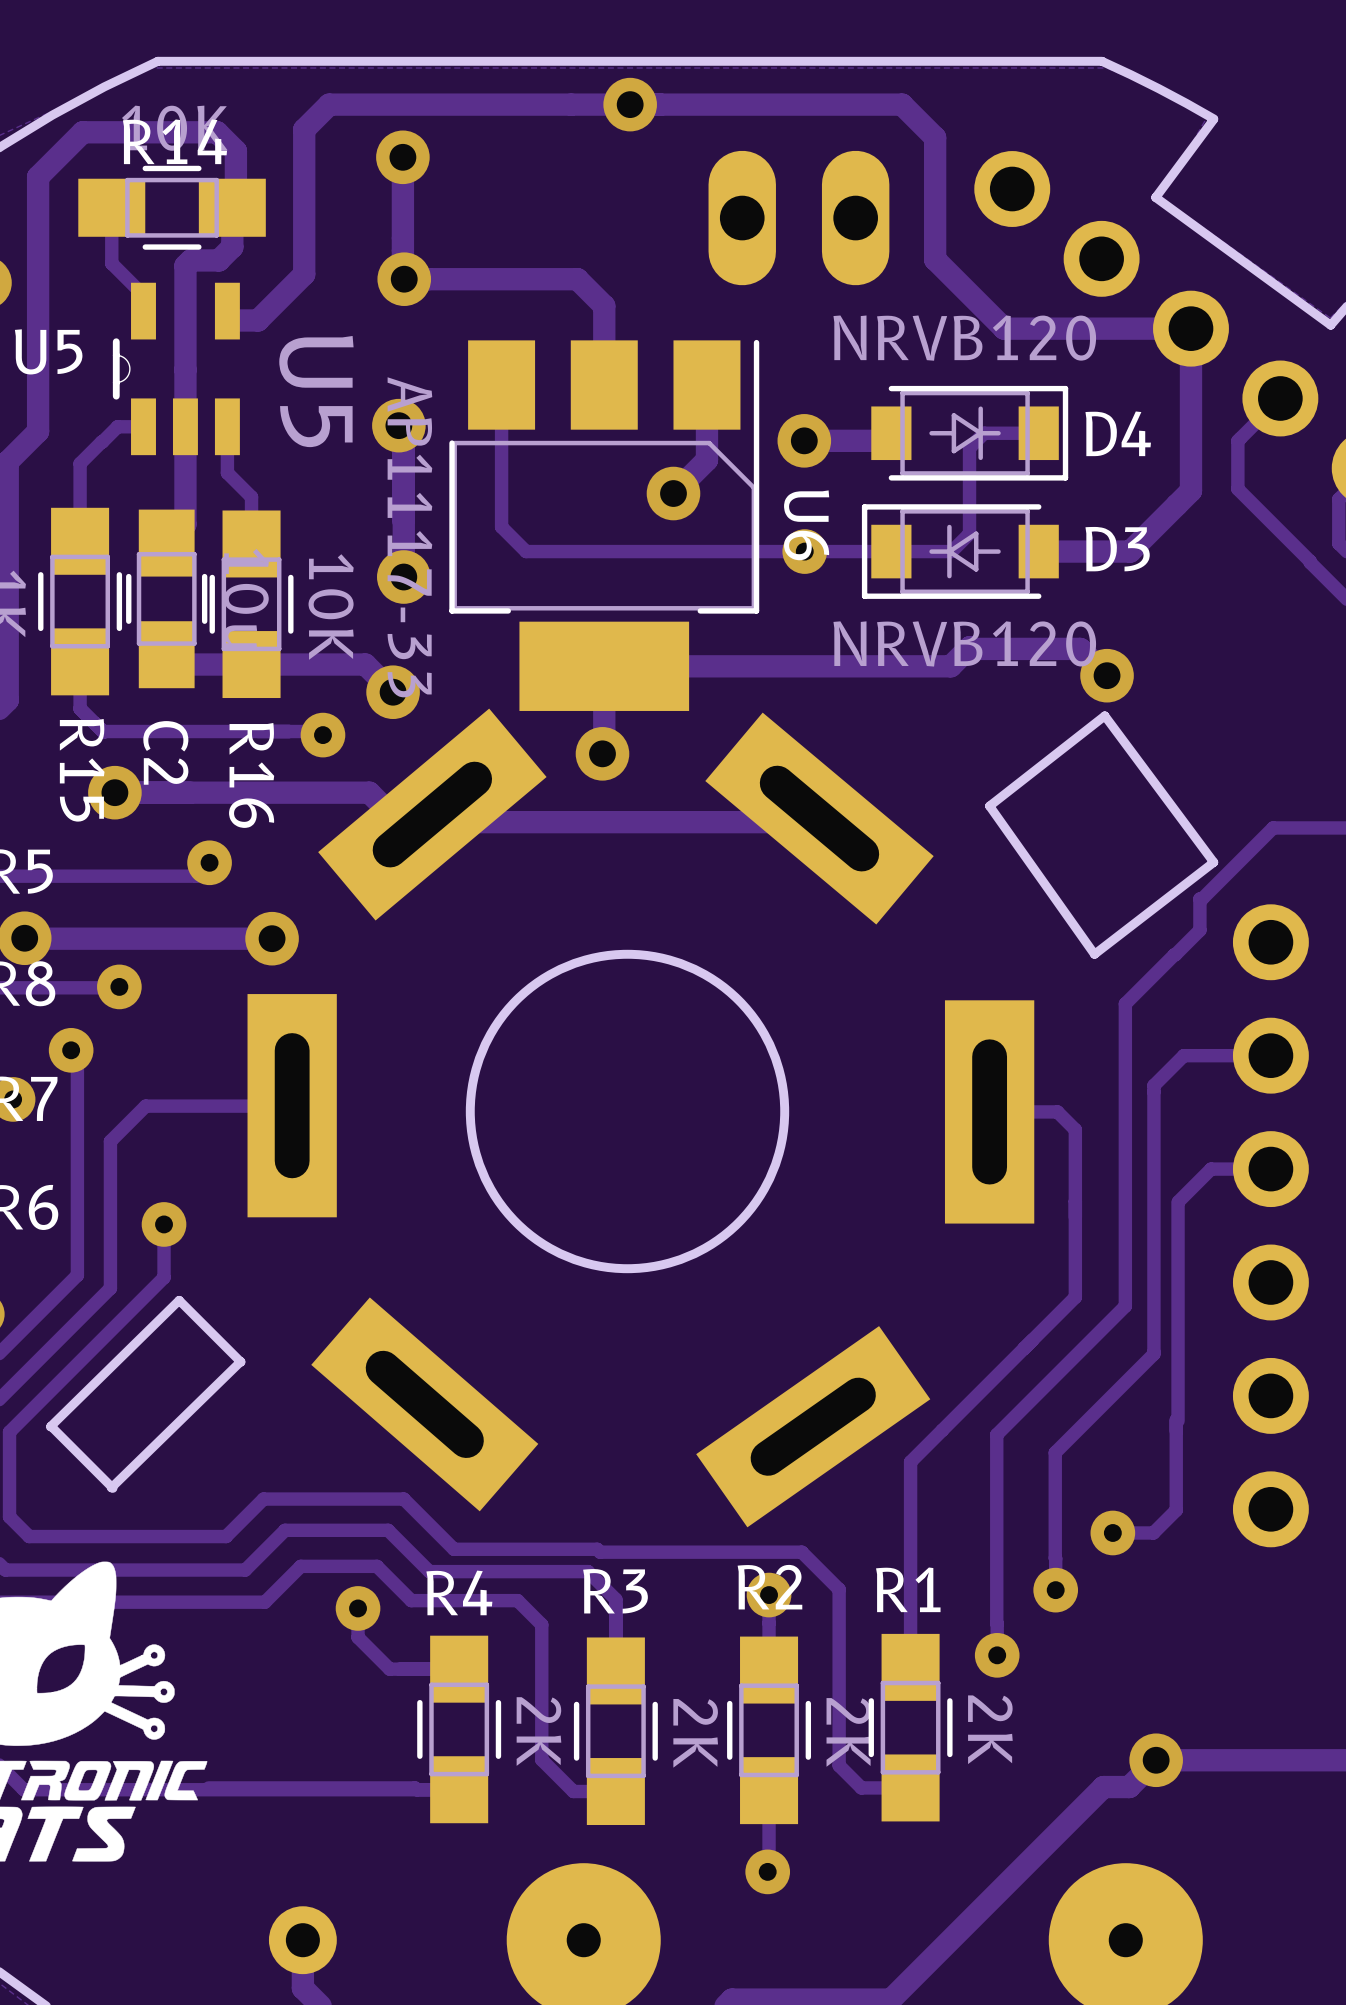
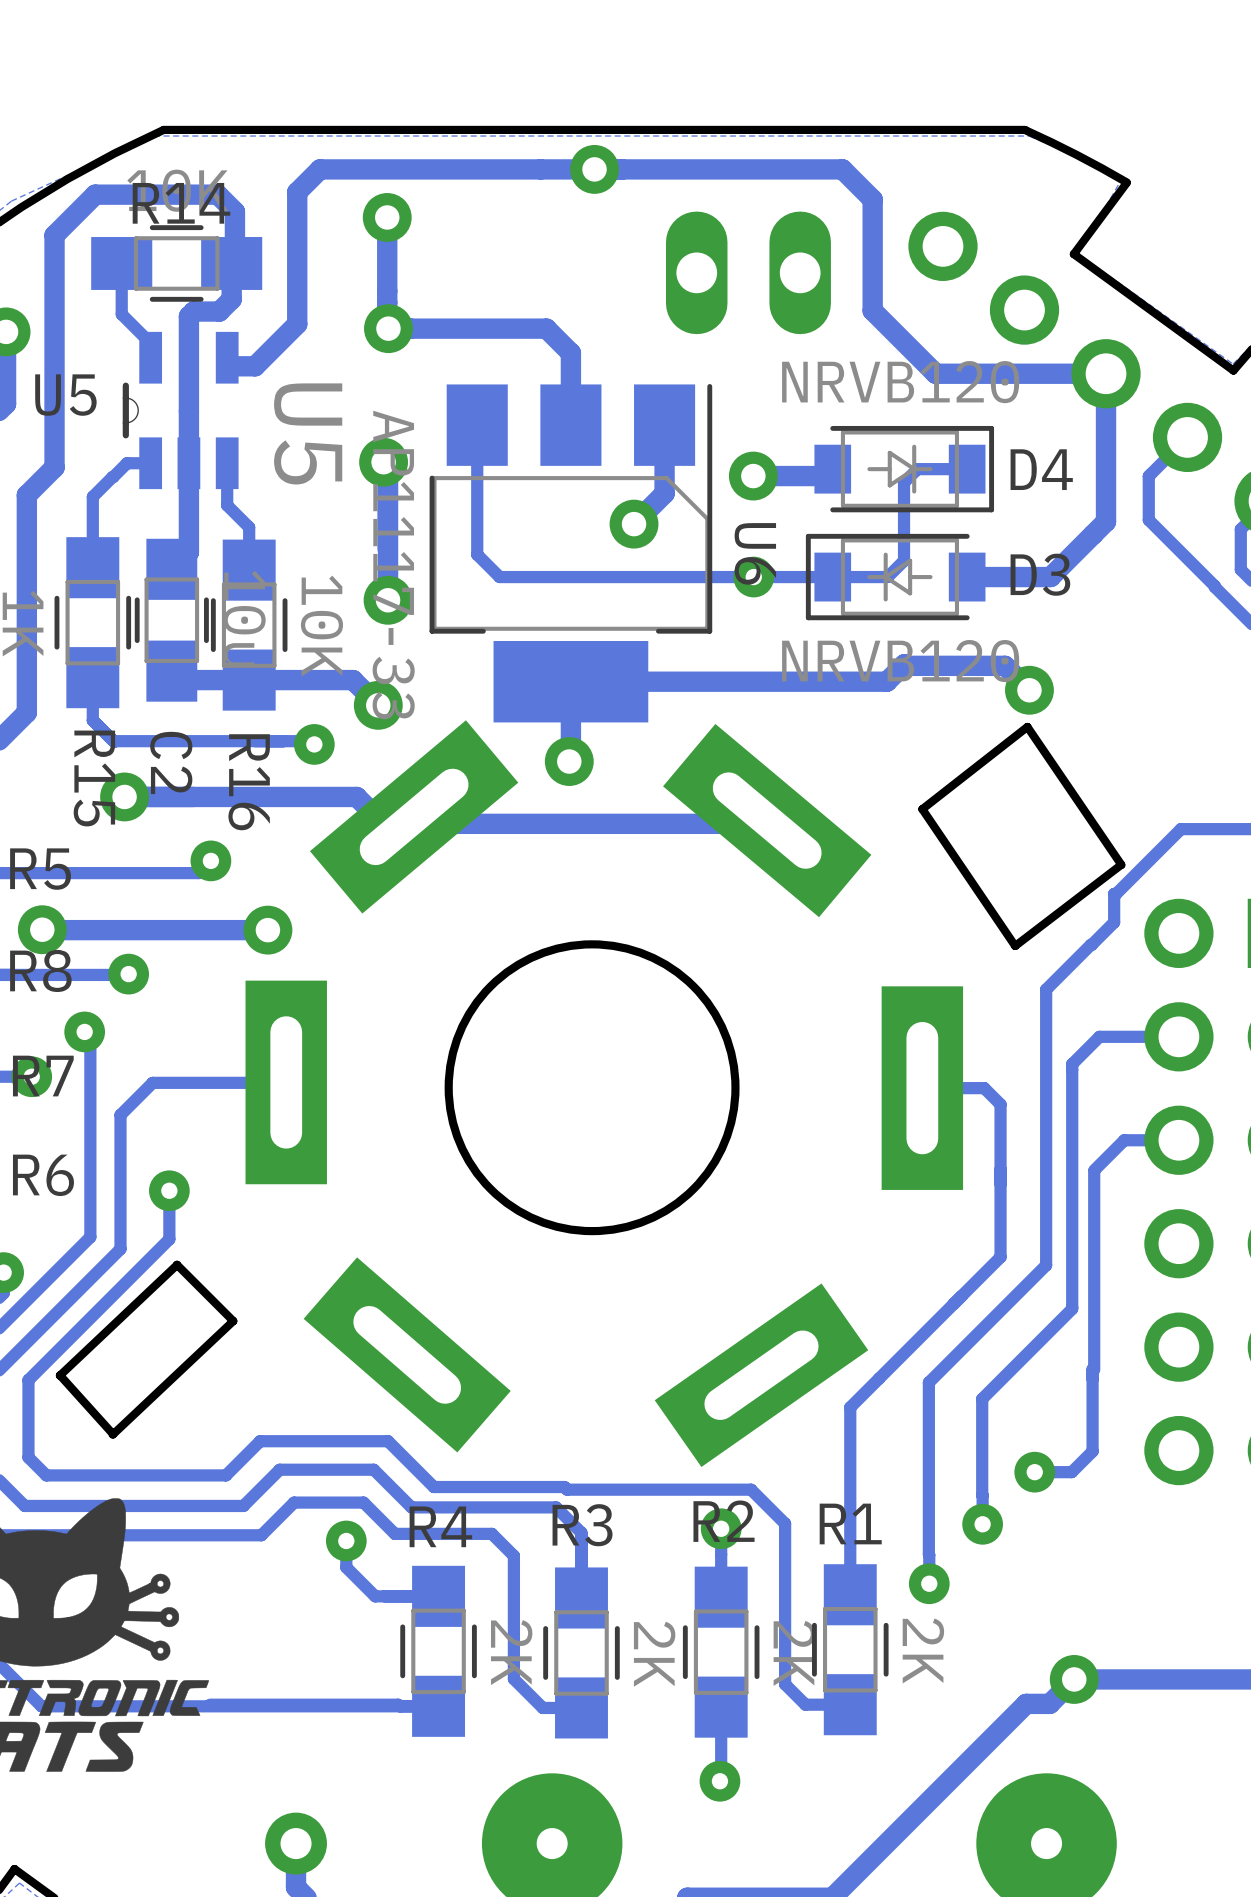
board edge: (1104, 715) (1213, 862) (1094, 954) (989, 806) -> (1121, 864) (1015, 946) (922, 809)
board edge: none -> (1027, 726) (1121, 864)
board edge: (240, 1361) (111, 1487) -> none
board edge: (241, 1362) (179, 1300) (50, 1426) -> none
board edge: none -> (59, 1375) (113, 1434)
board edge: (51, 1426) (112, 1488) -> none
board edge: none -> (59, 1375) (177, 1264) (233, 1321) (112, 1434)

